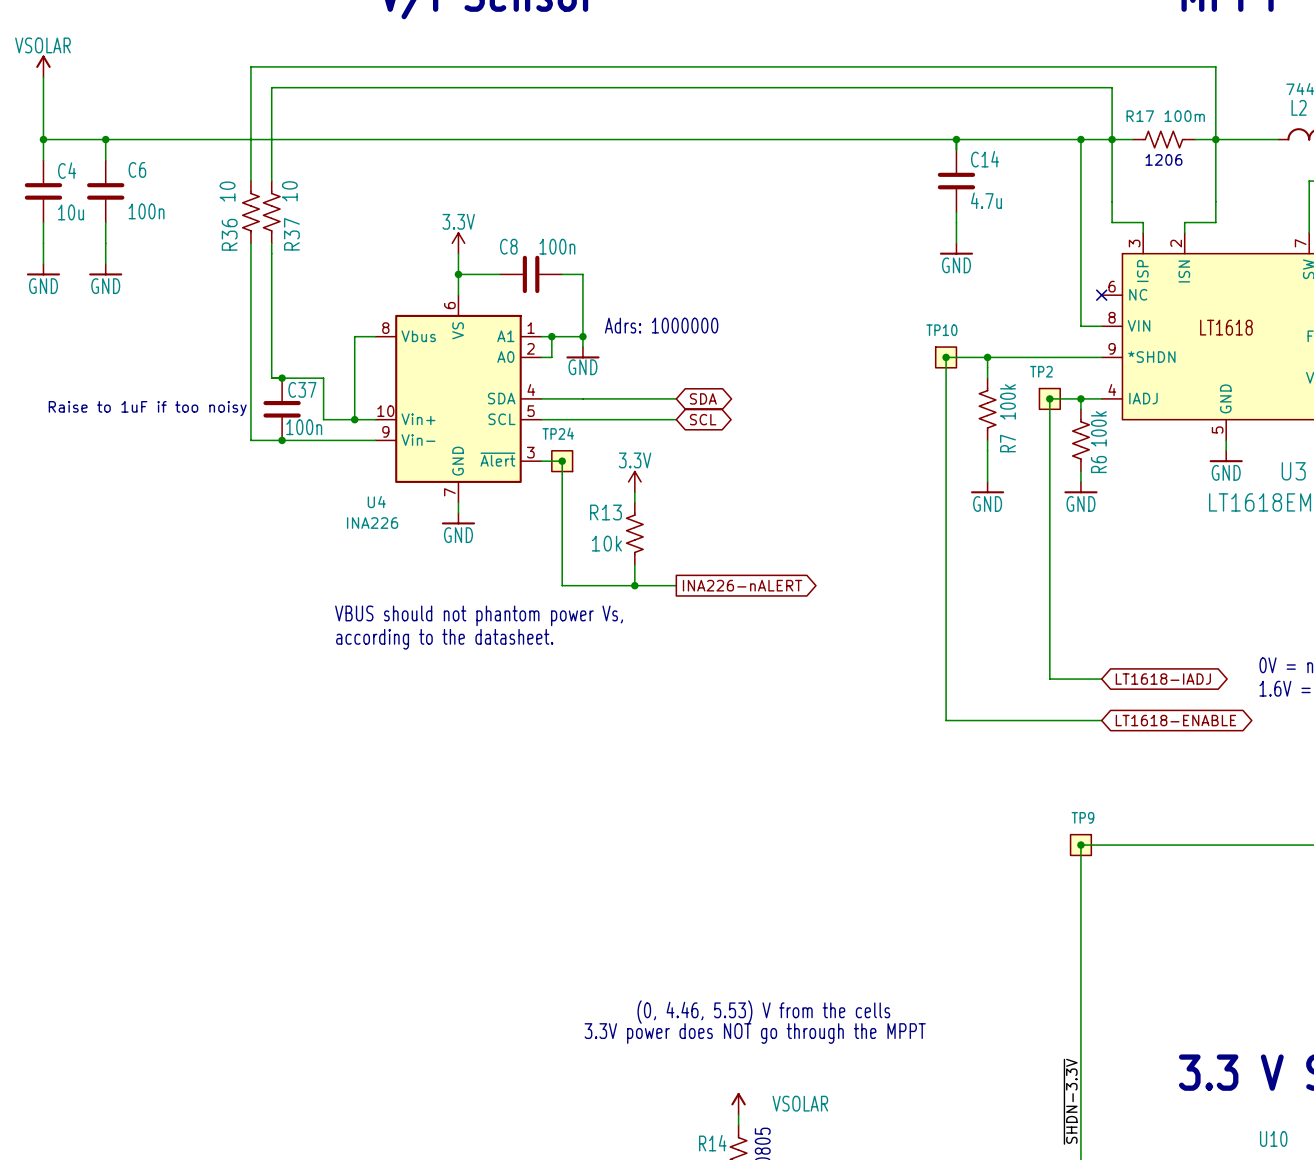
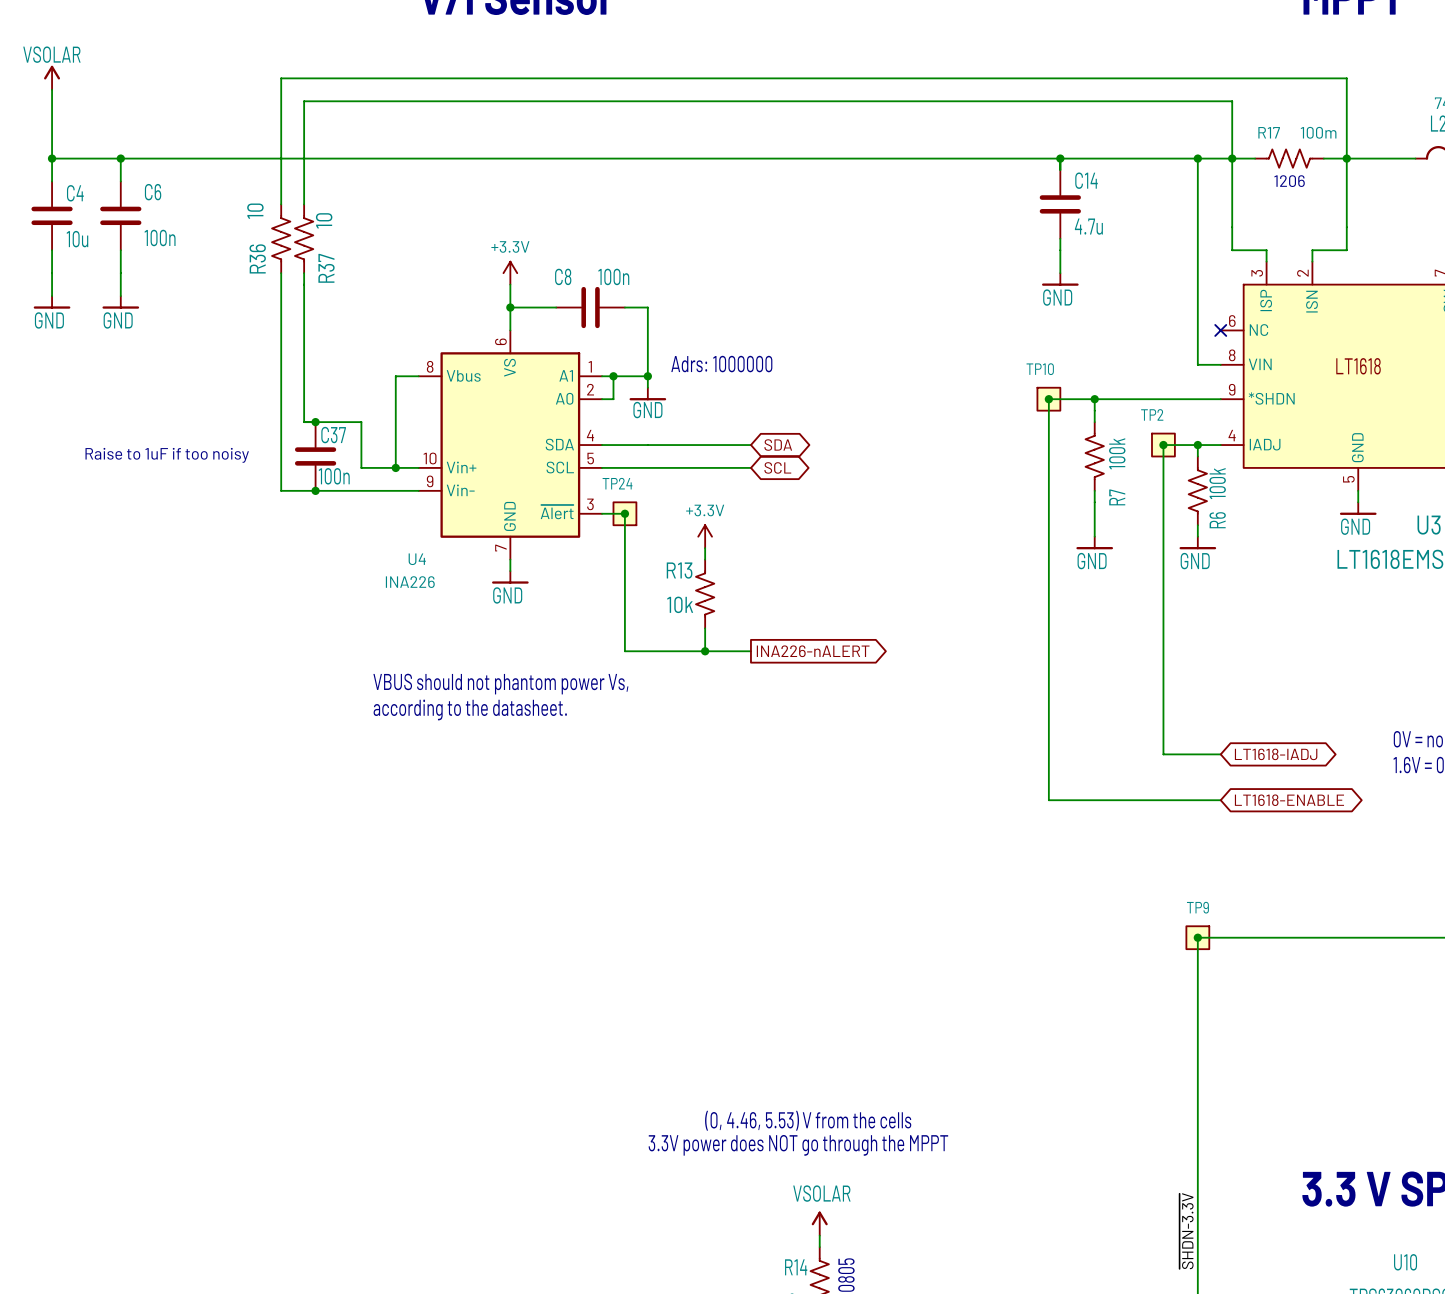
power symbol: 3.3V (458, 243) -> +3.3V (510, 273)
power symbol: 3.3V (634, 481) -> +3.3V (705, 536)
power symbol text position: VSOLAR (800, 1103) -> VSOLAR (821, 1193)

